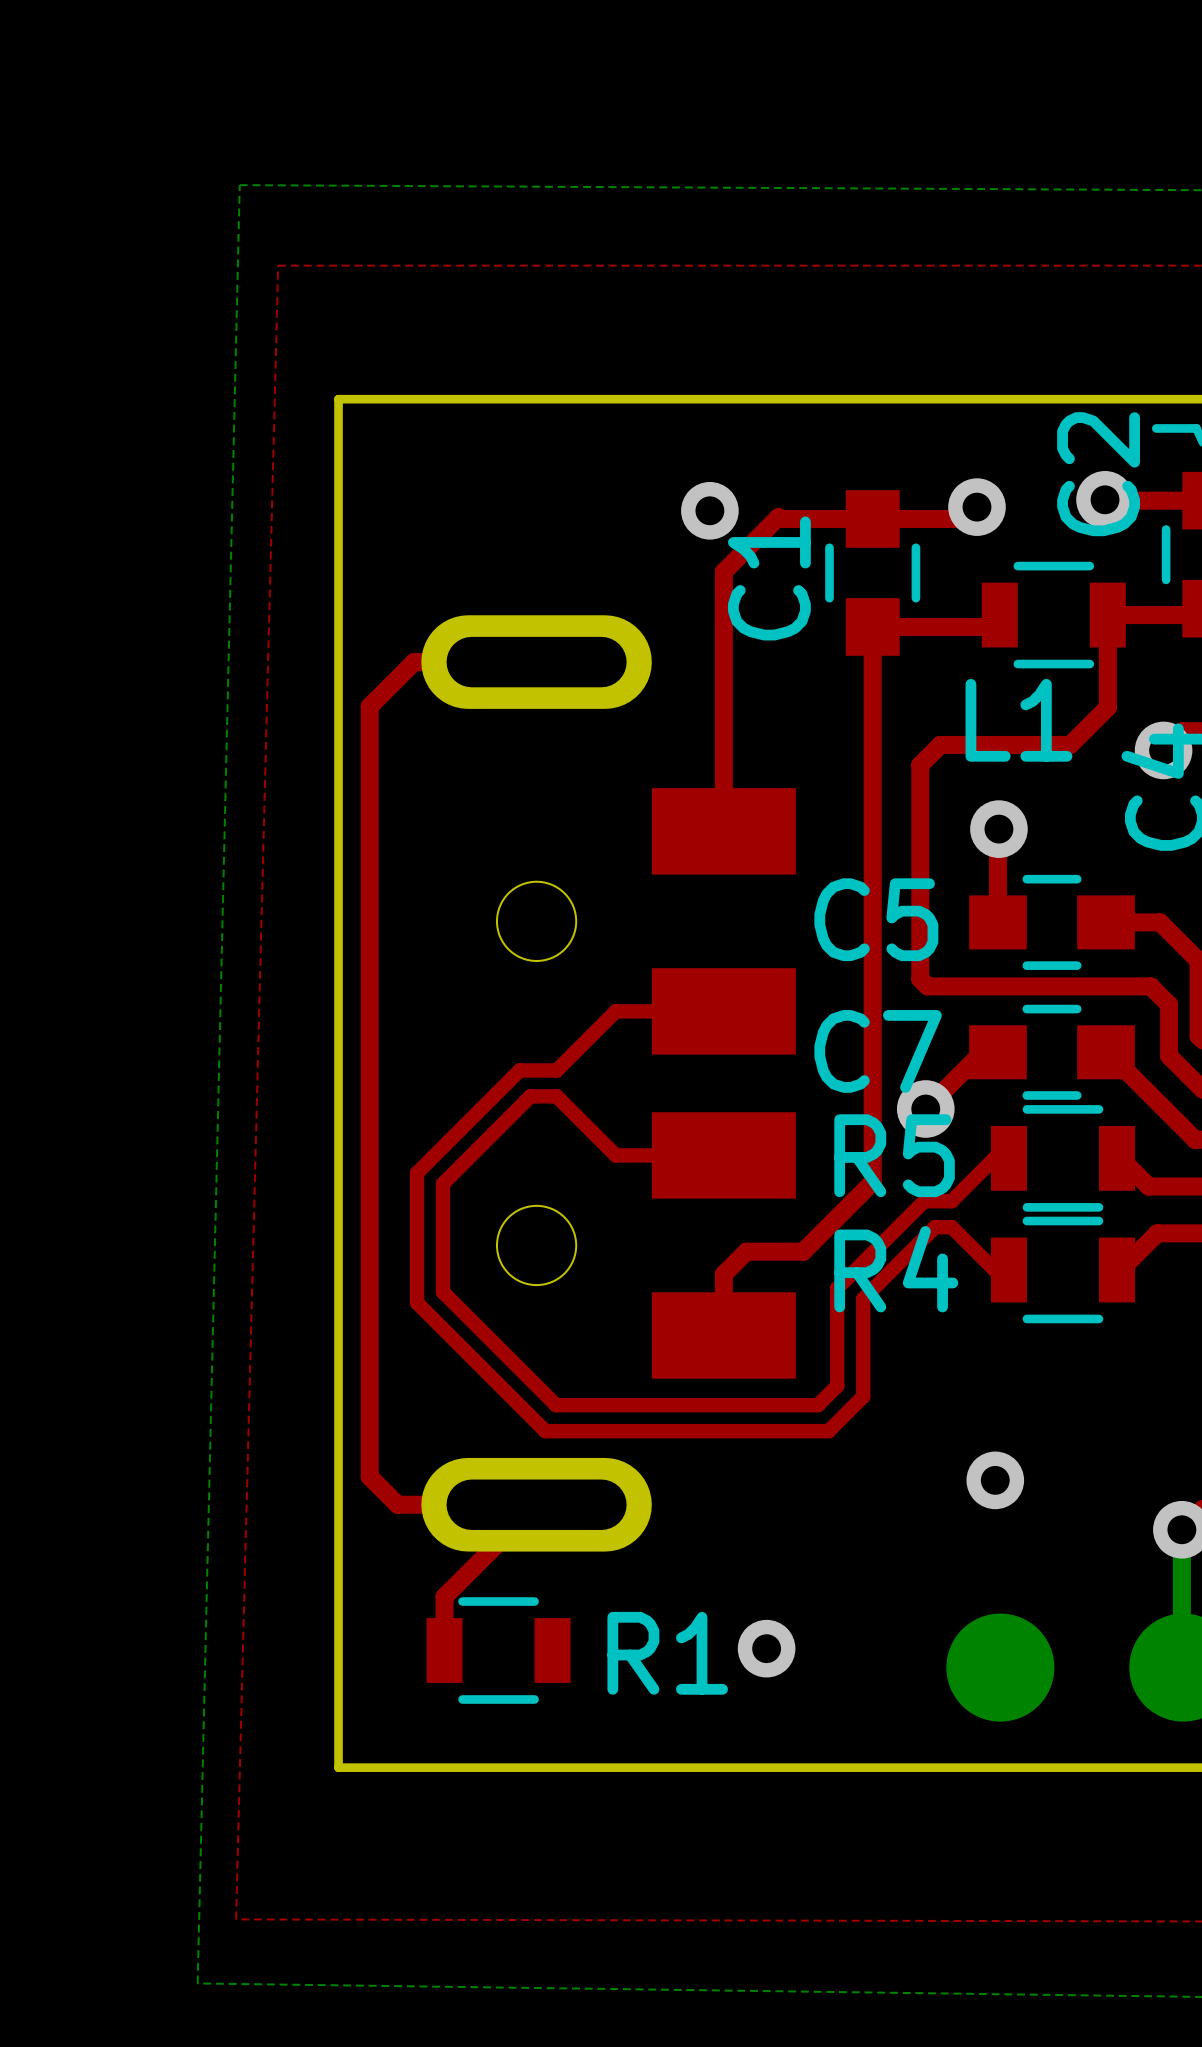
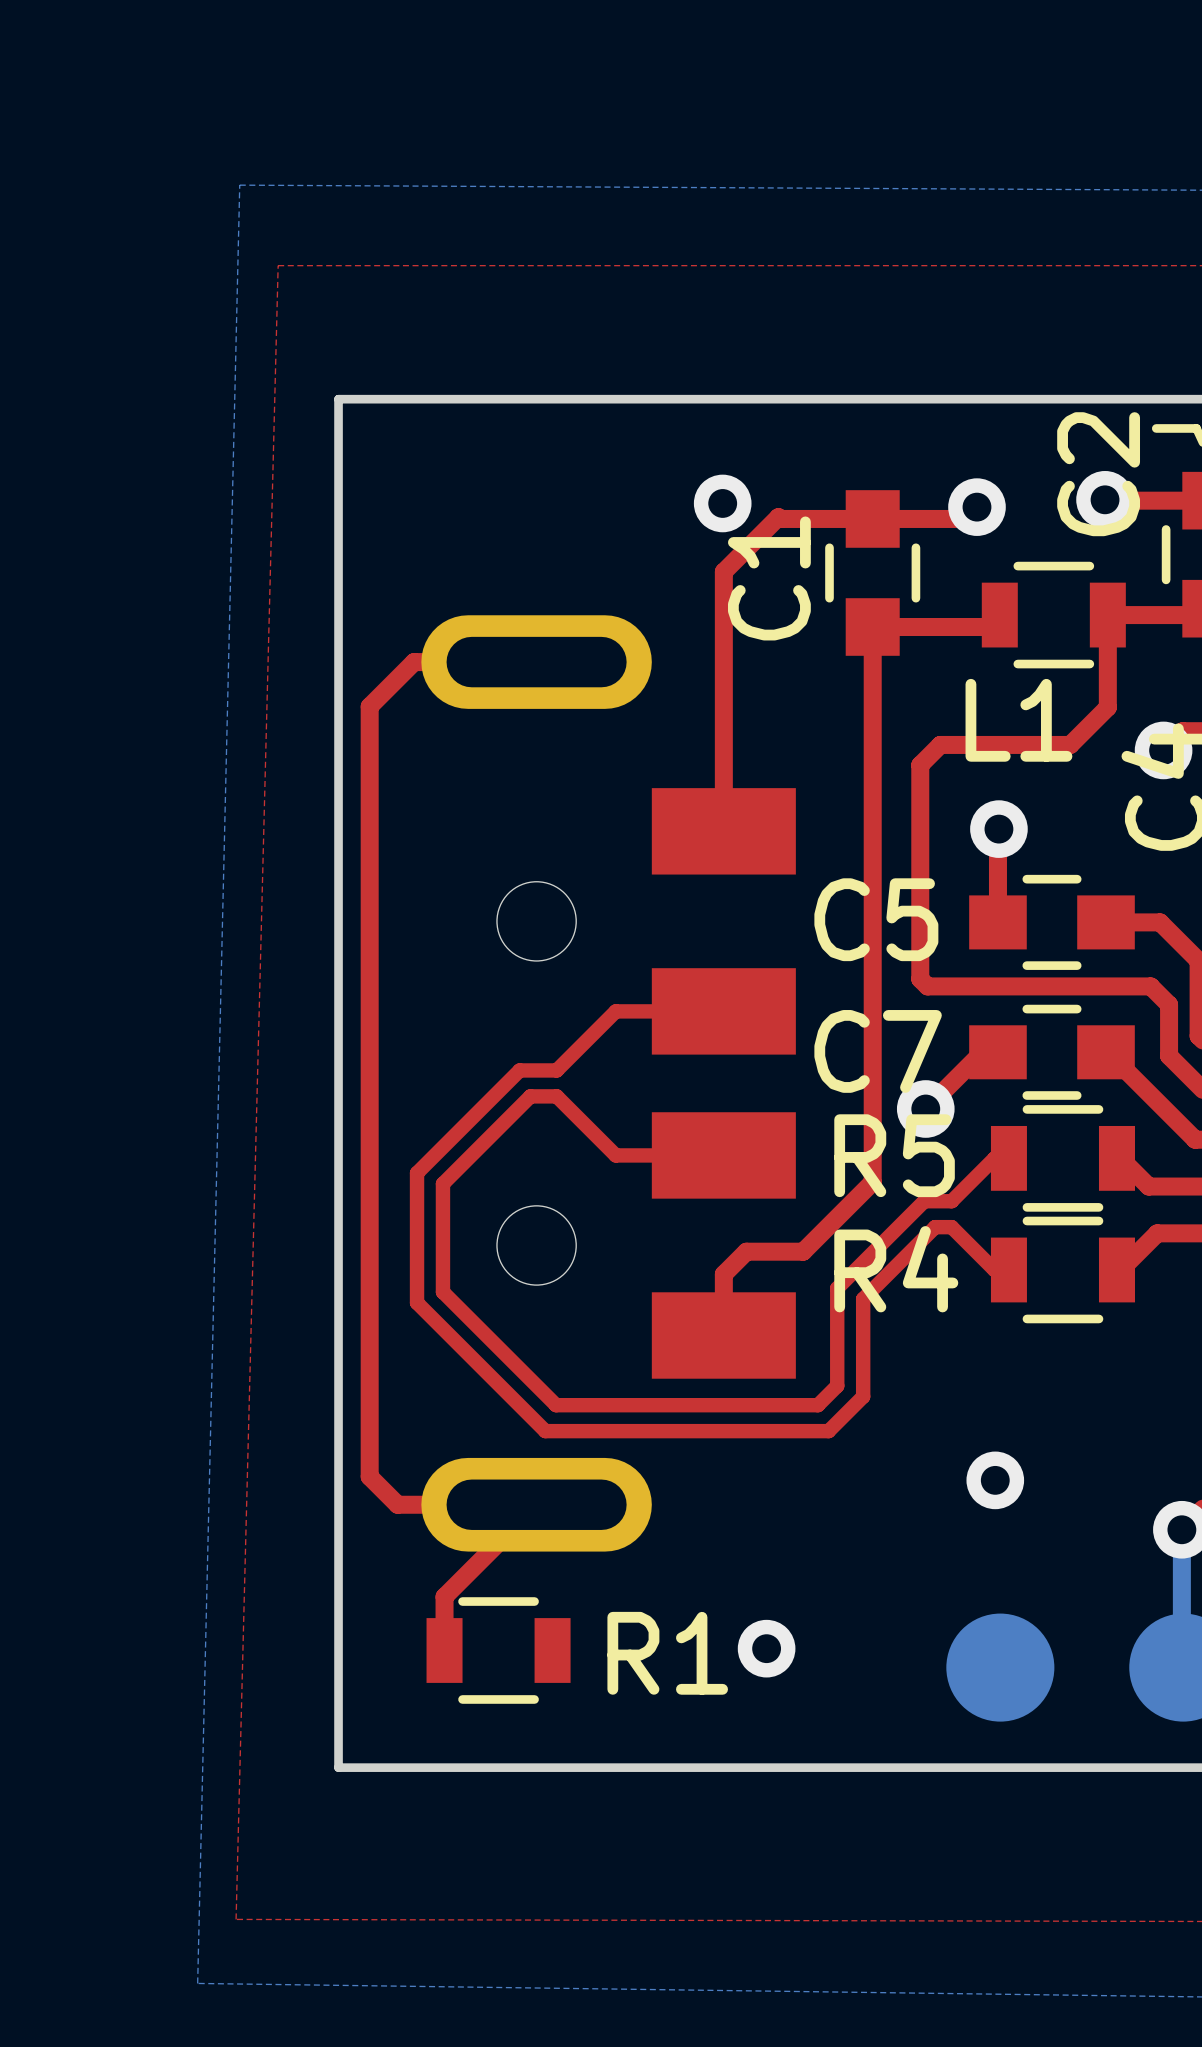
via position: (709, 510) -> (722, 503)

